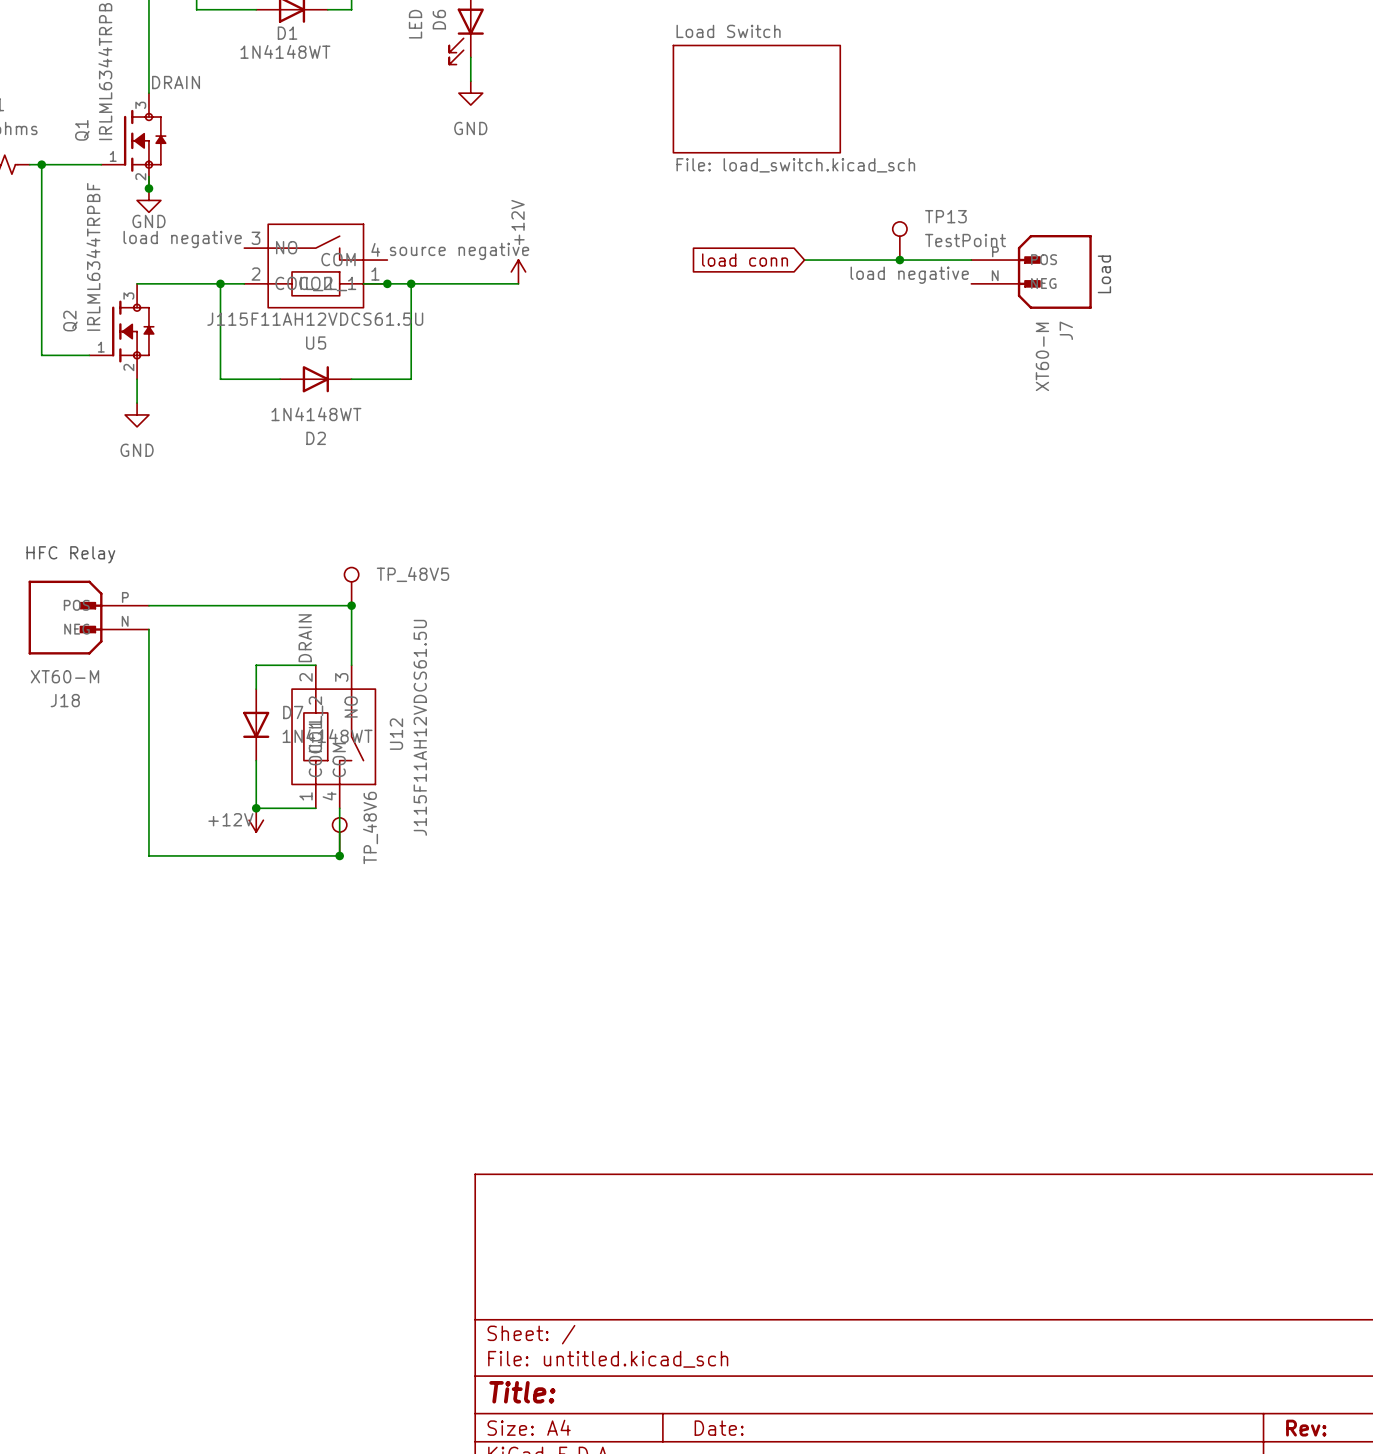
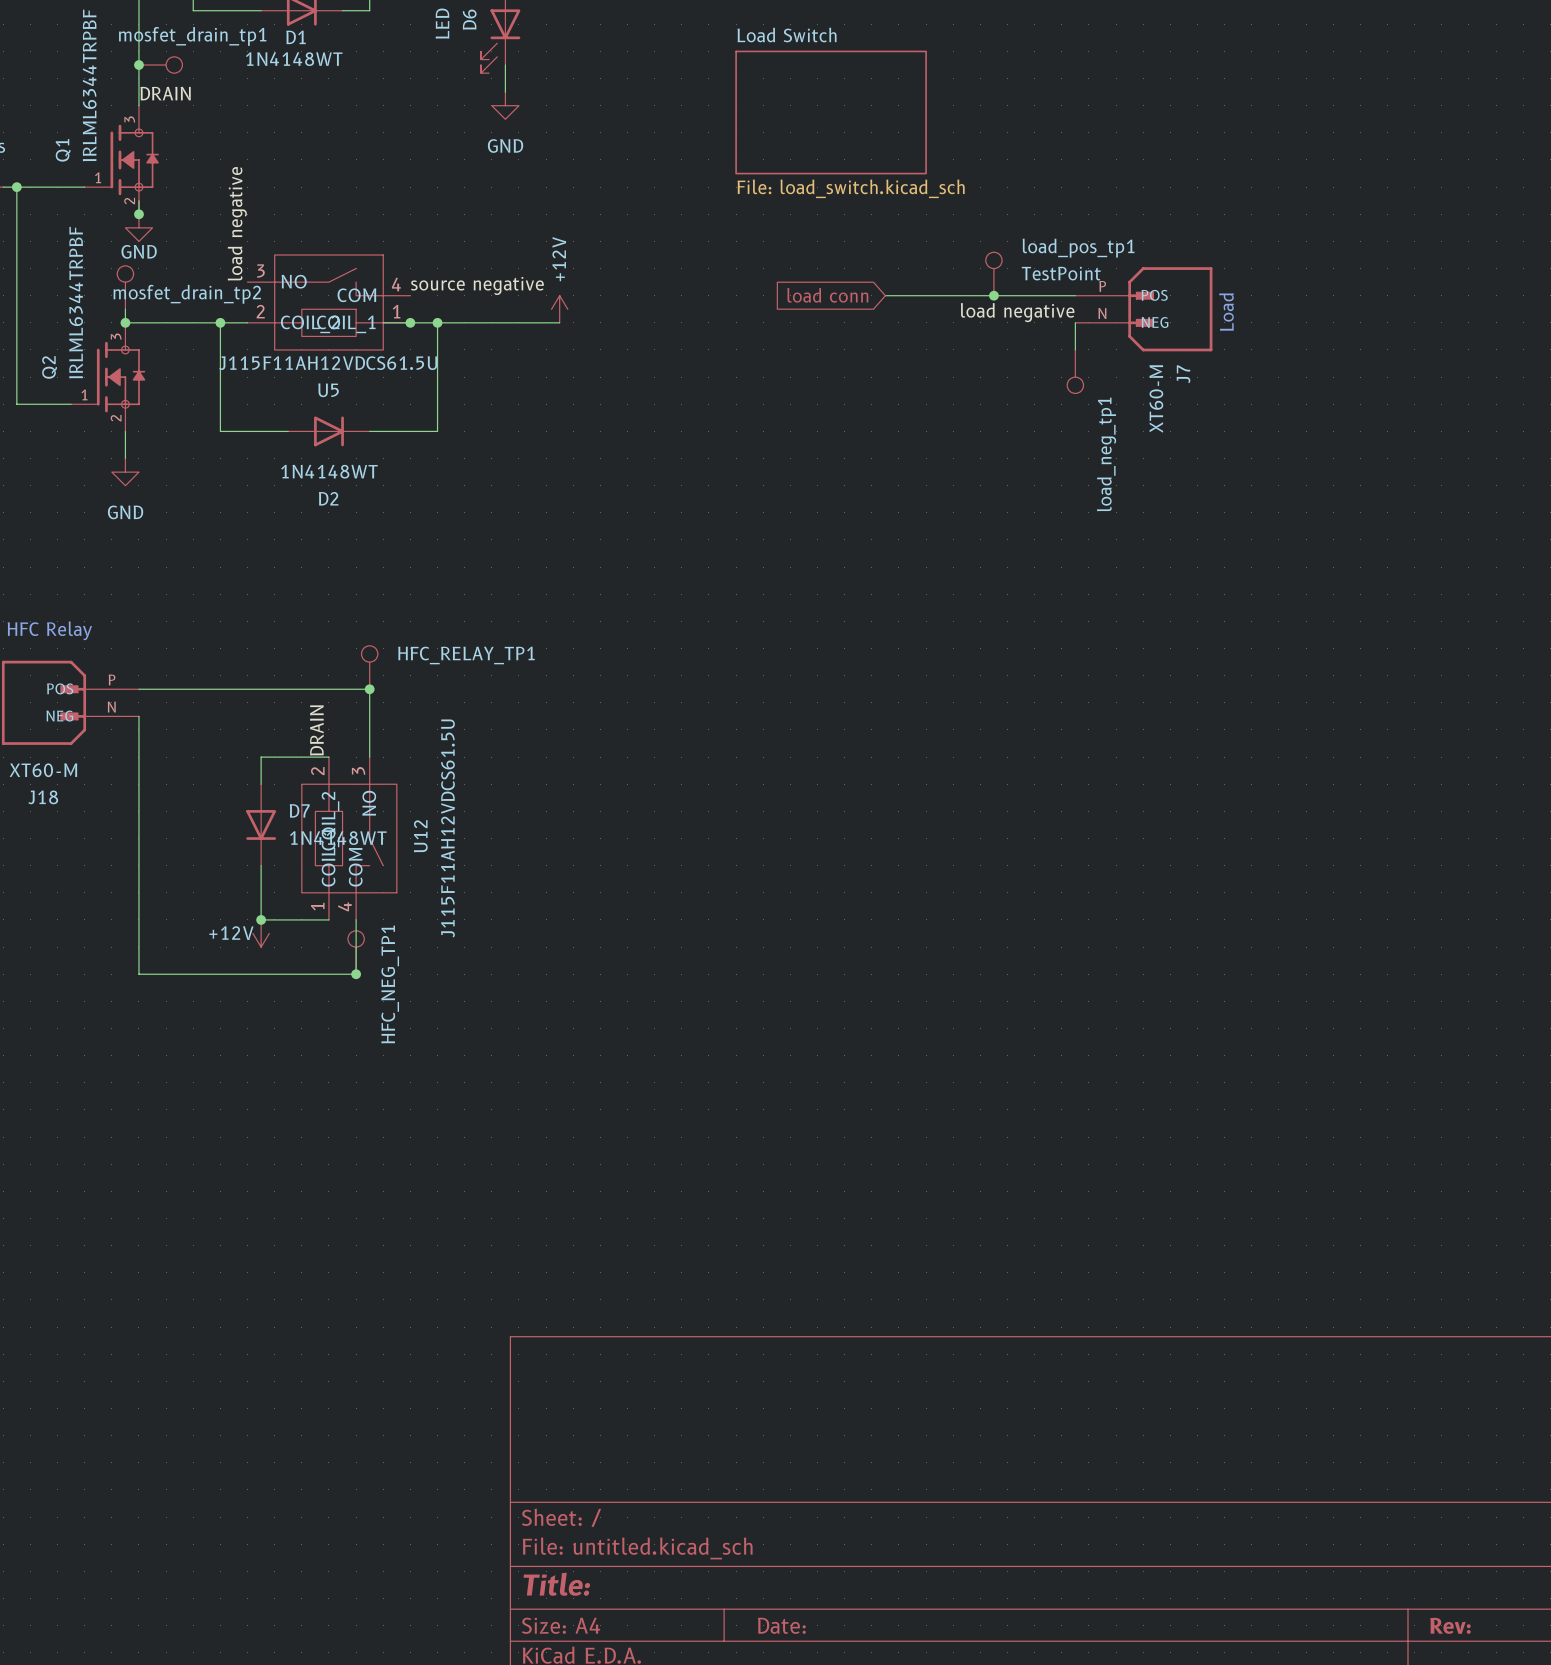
junction: none -> (138, 65)
mosfet_drain_tp1: none -> (160, 65)
TP13 name: TP13 (945, 216) -> load_pos_tp1 (1078, 248)
label rotation: 0° (182, 239) -> 90° counterclockwise (237, 223)
mosfet_drain_tp2: none -> (125, 287)
wire: none -> (125, 309) (125, 322)
junction: none -> (125, 322)
wire: none -> (1075, 322) (1075, 349)
load_neg_tp1: none -> (1075, 371)
TP_48V5 name: TP_48V5 (412, 574) -> HFC_RELAY_TP1 (466, 655)
TP_48V6 name: TP_48V6 (370, 827) -> HFC_NEG_TP1 (390, 984)

